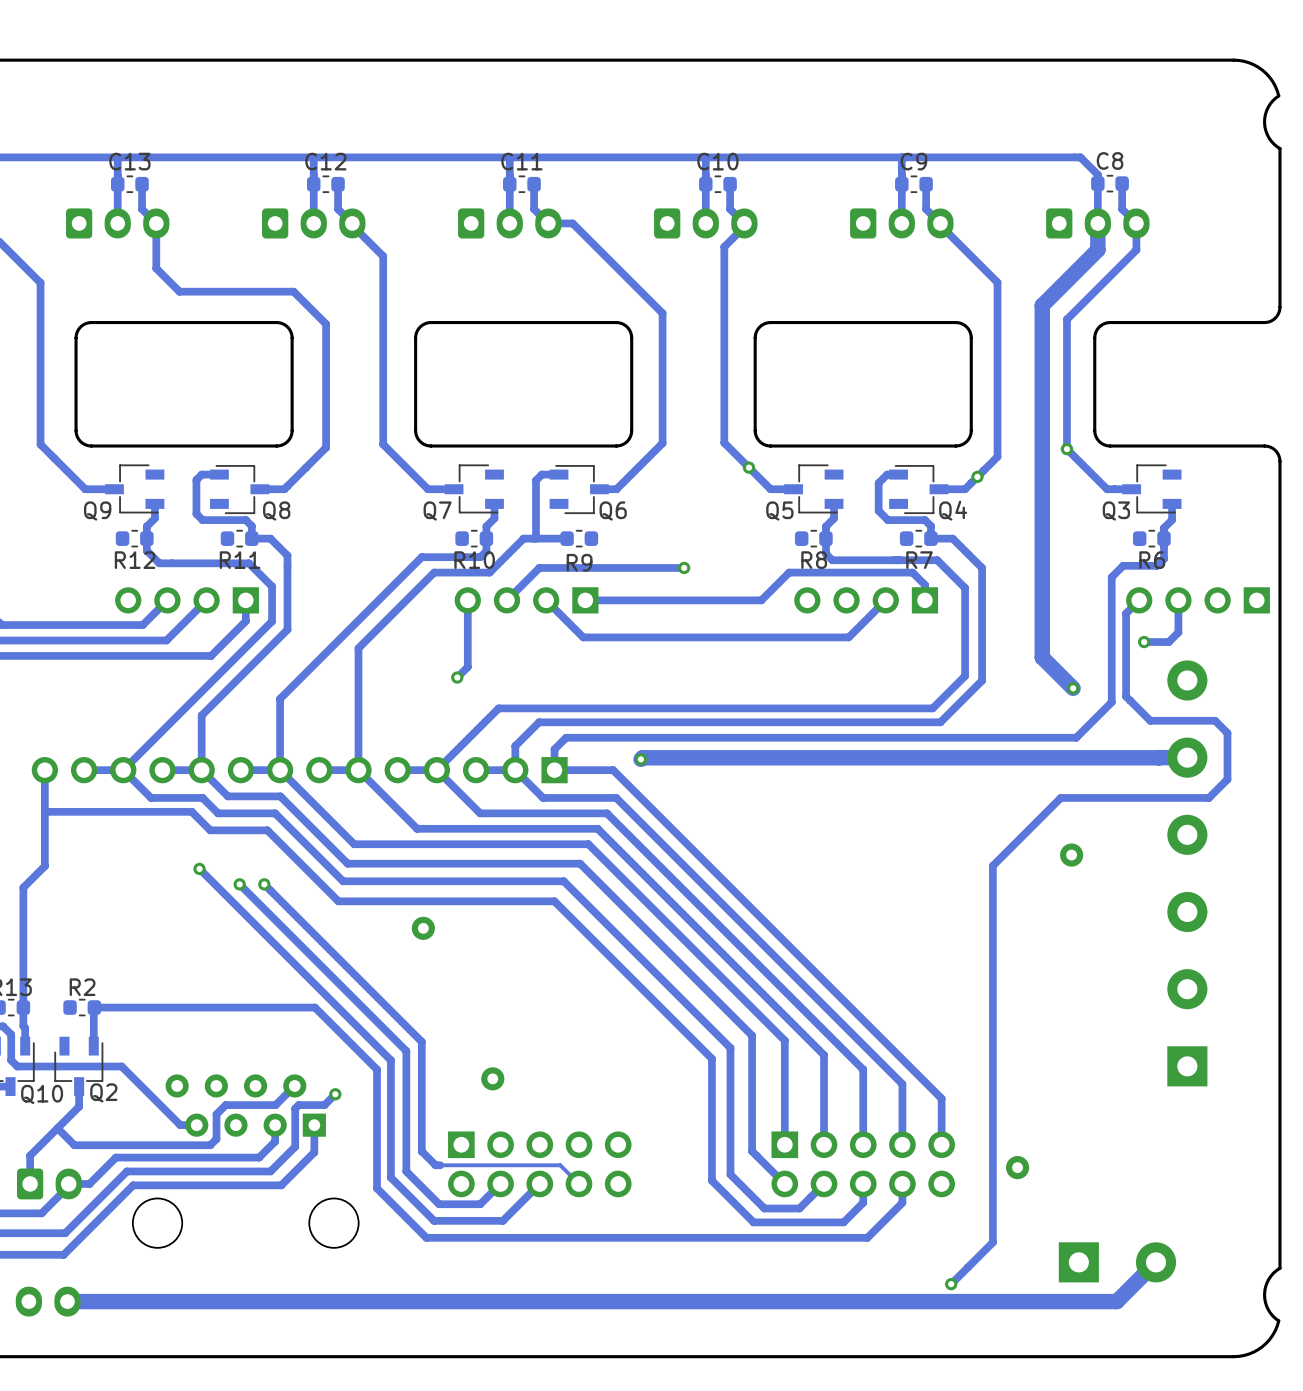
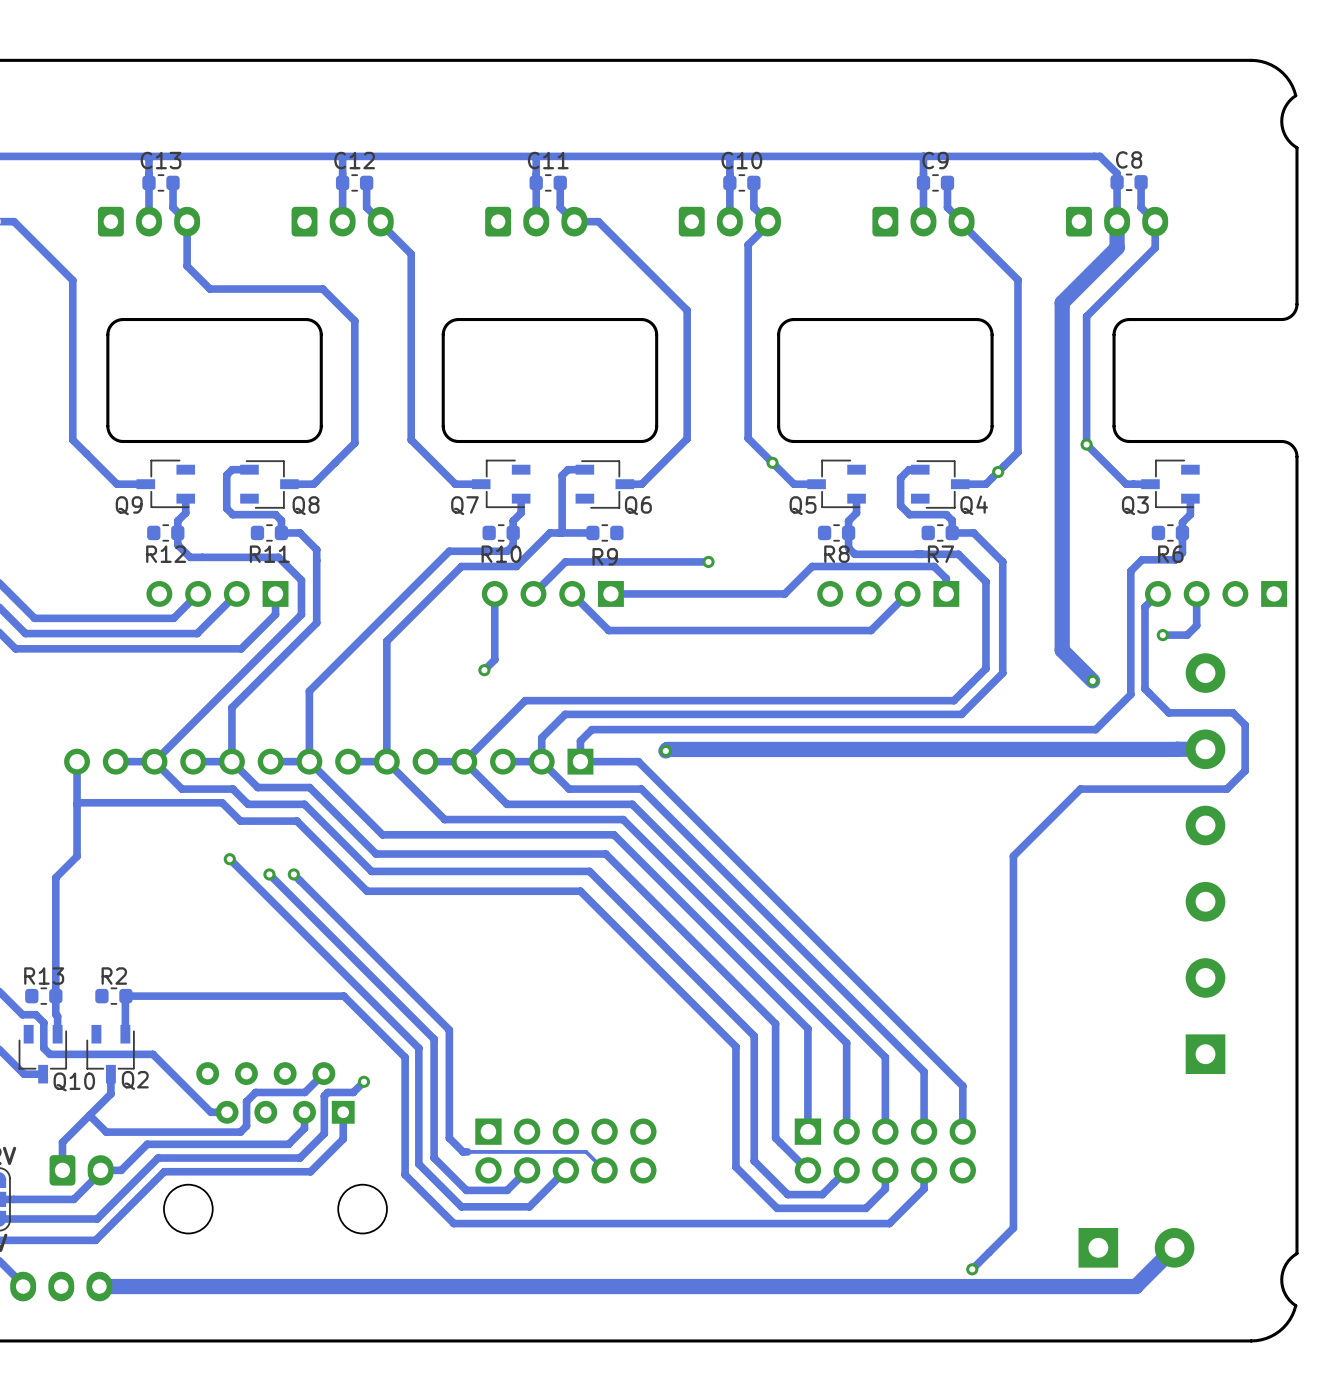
part: (1071, 855) -> none
part: (423, 928) -> none
part: (492, 1078) -> none
part: (1017, 1167) -> none

